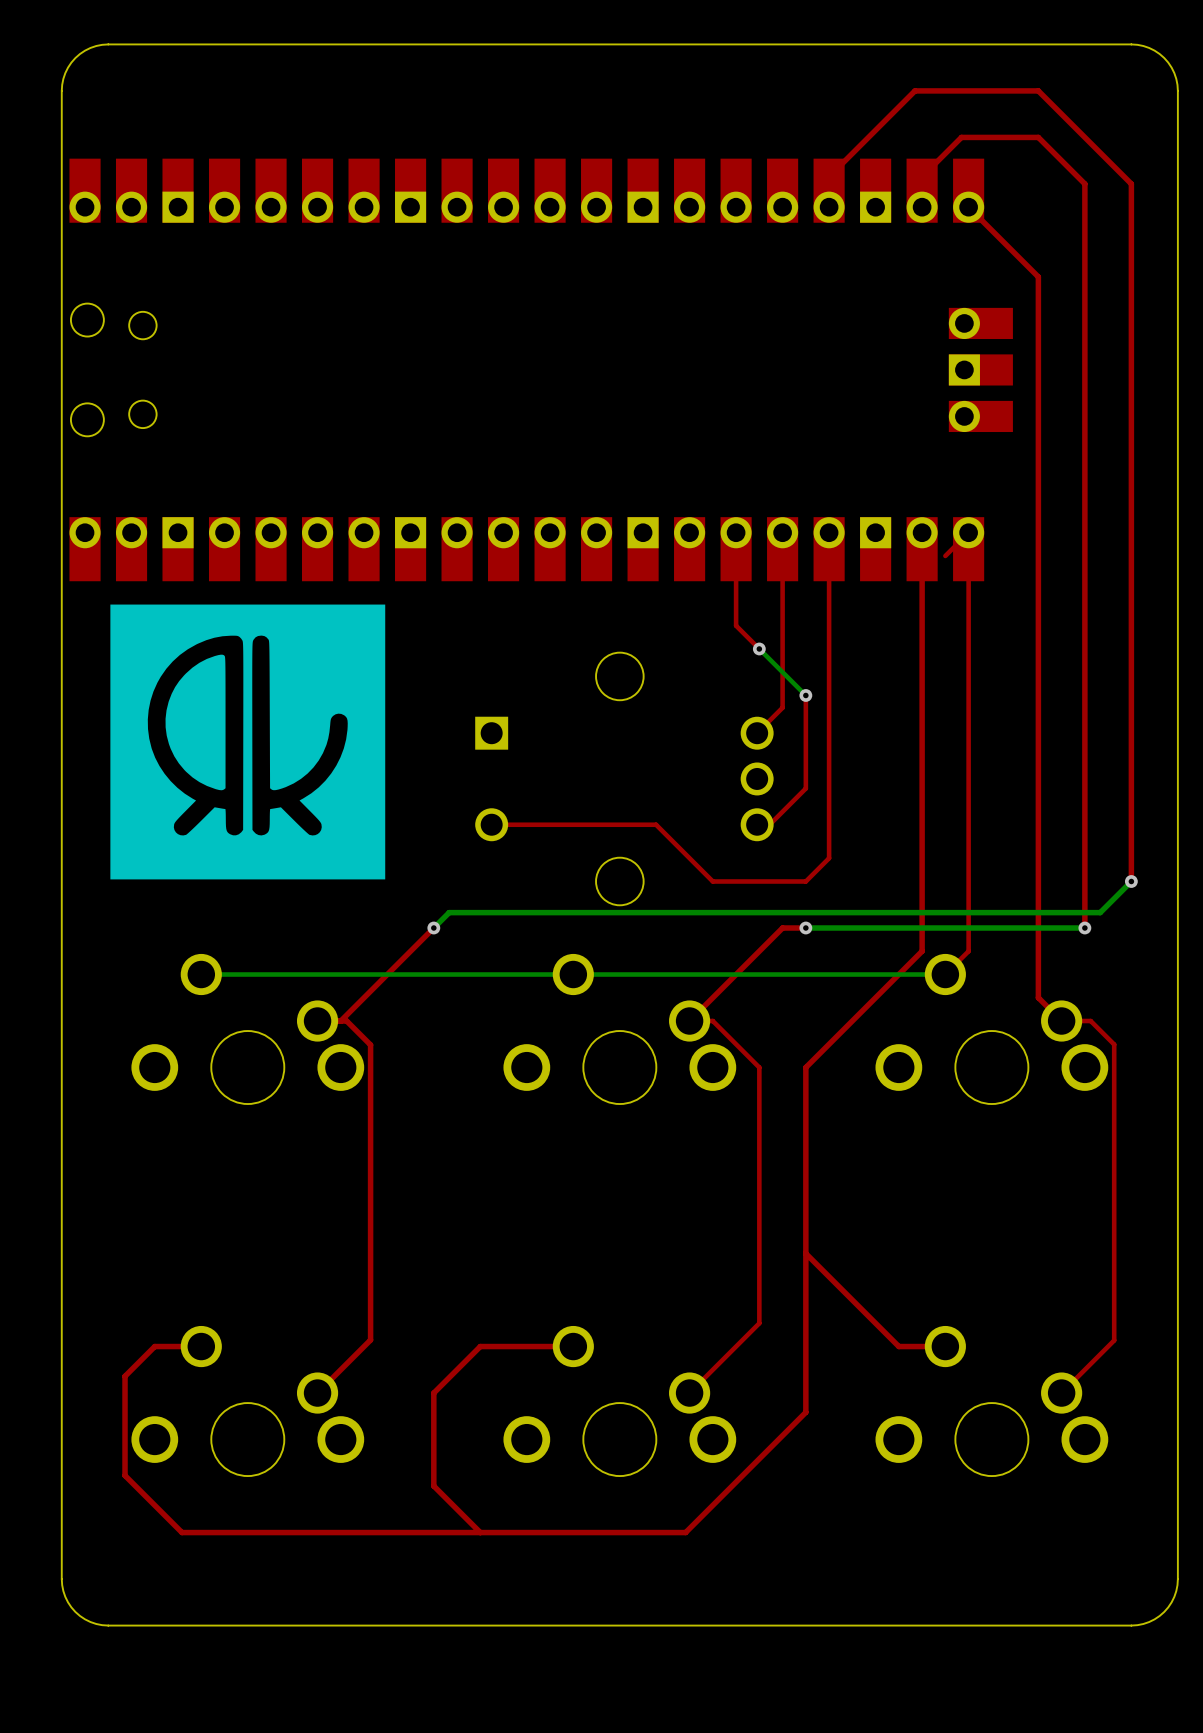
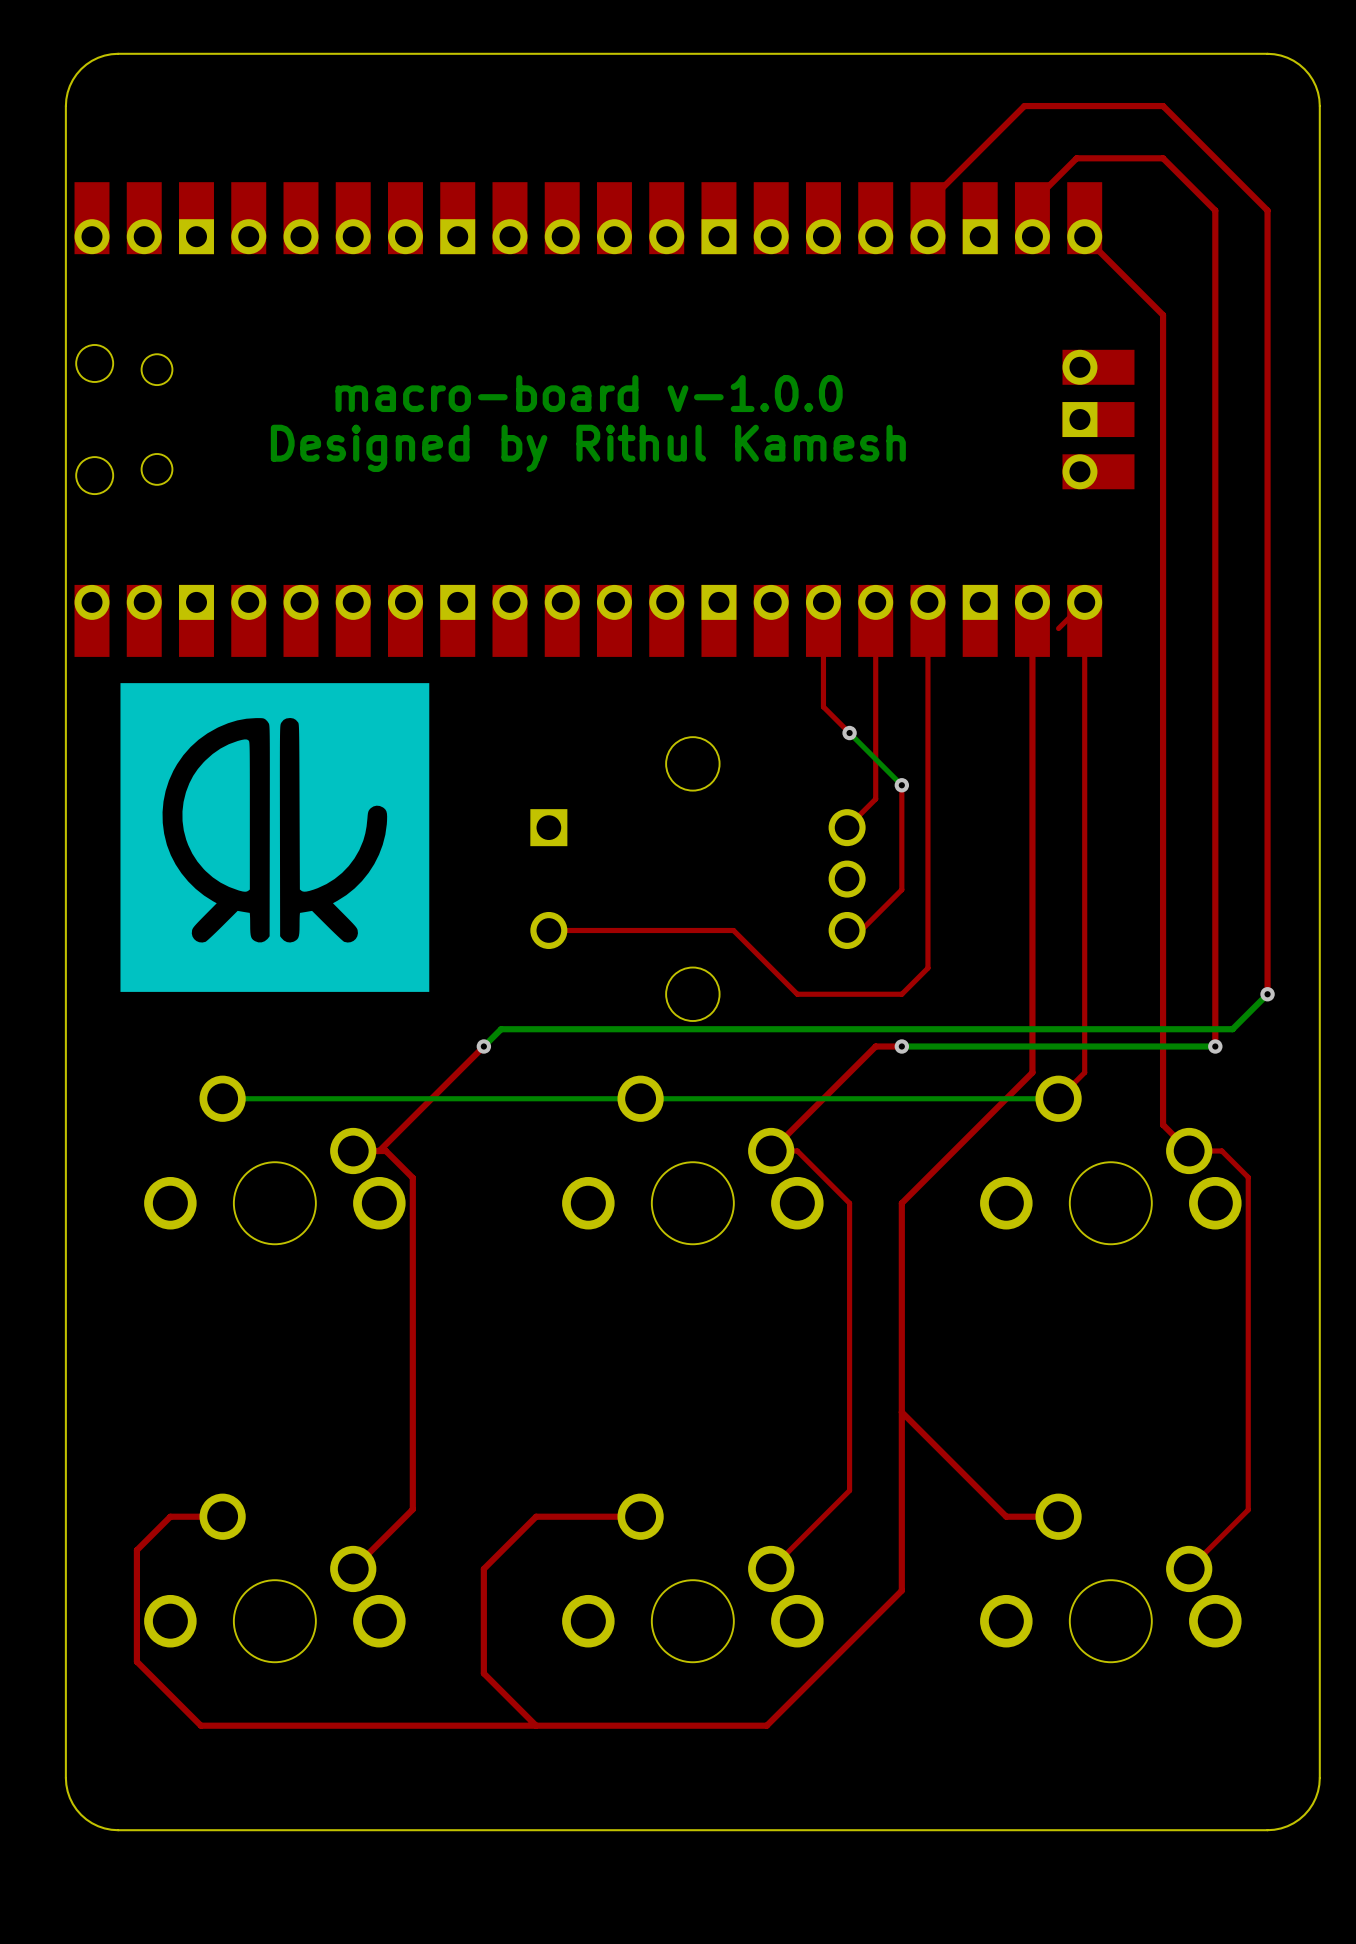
text: none -> macro-board v-1.0.0 (589, 393)
text: none -> Designed by Rithul Kamesh (588, 448)

